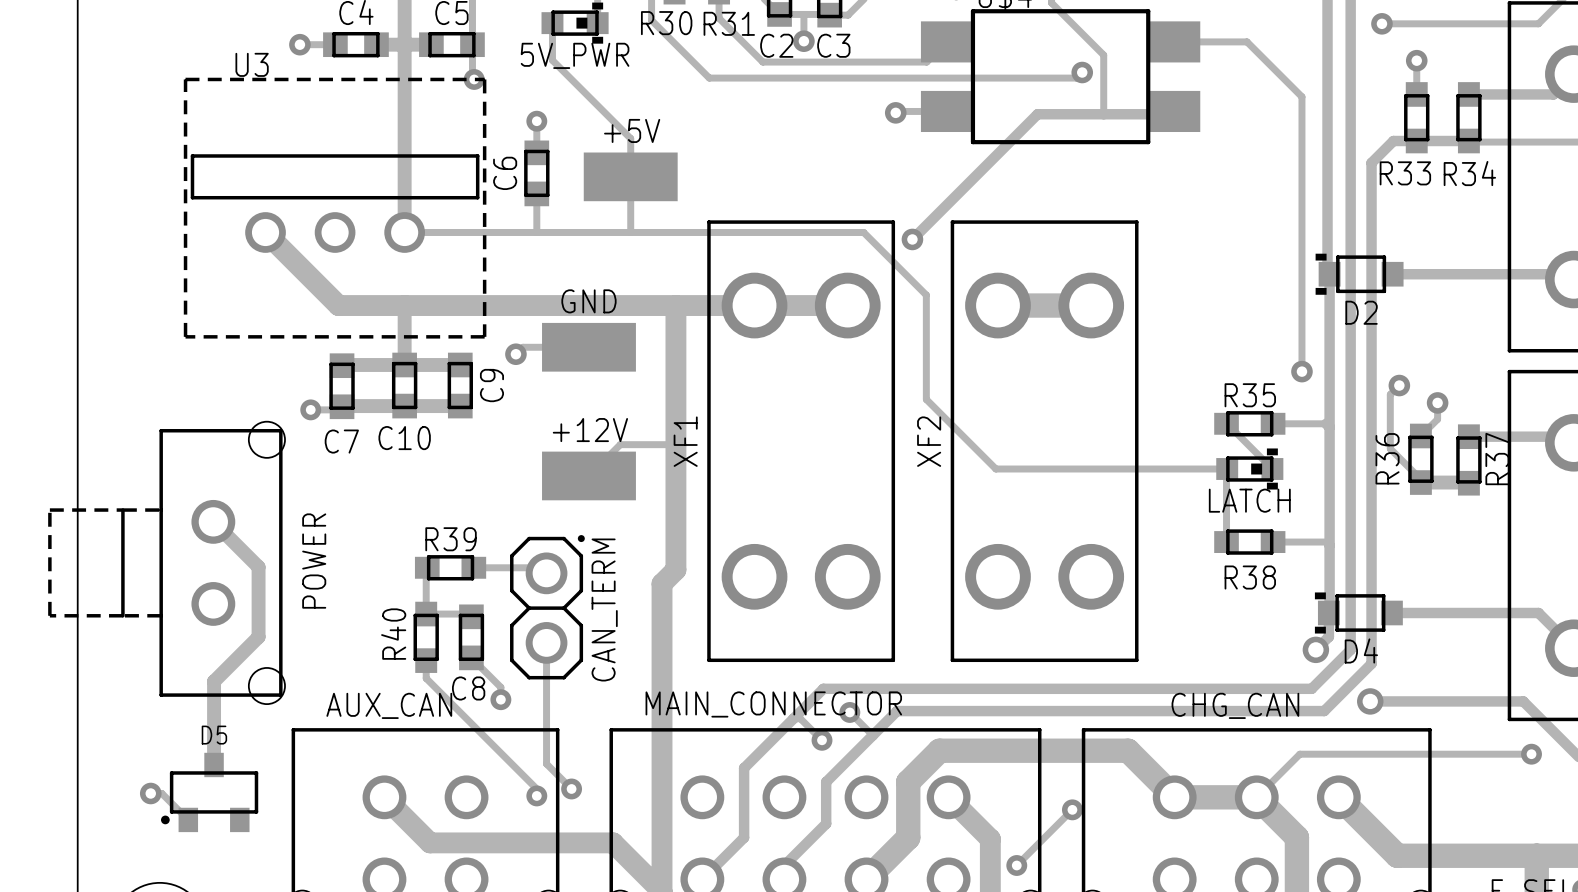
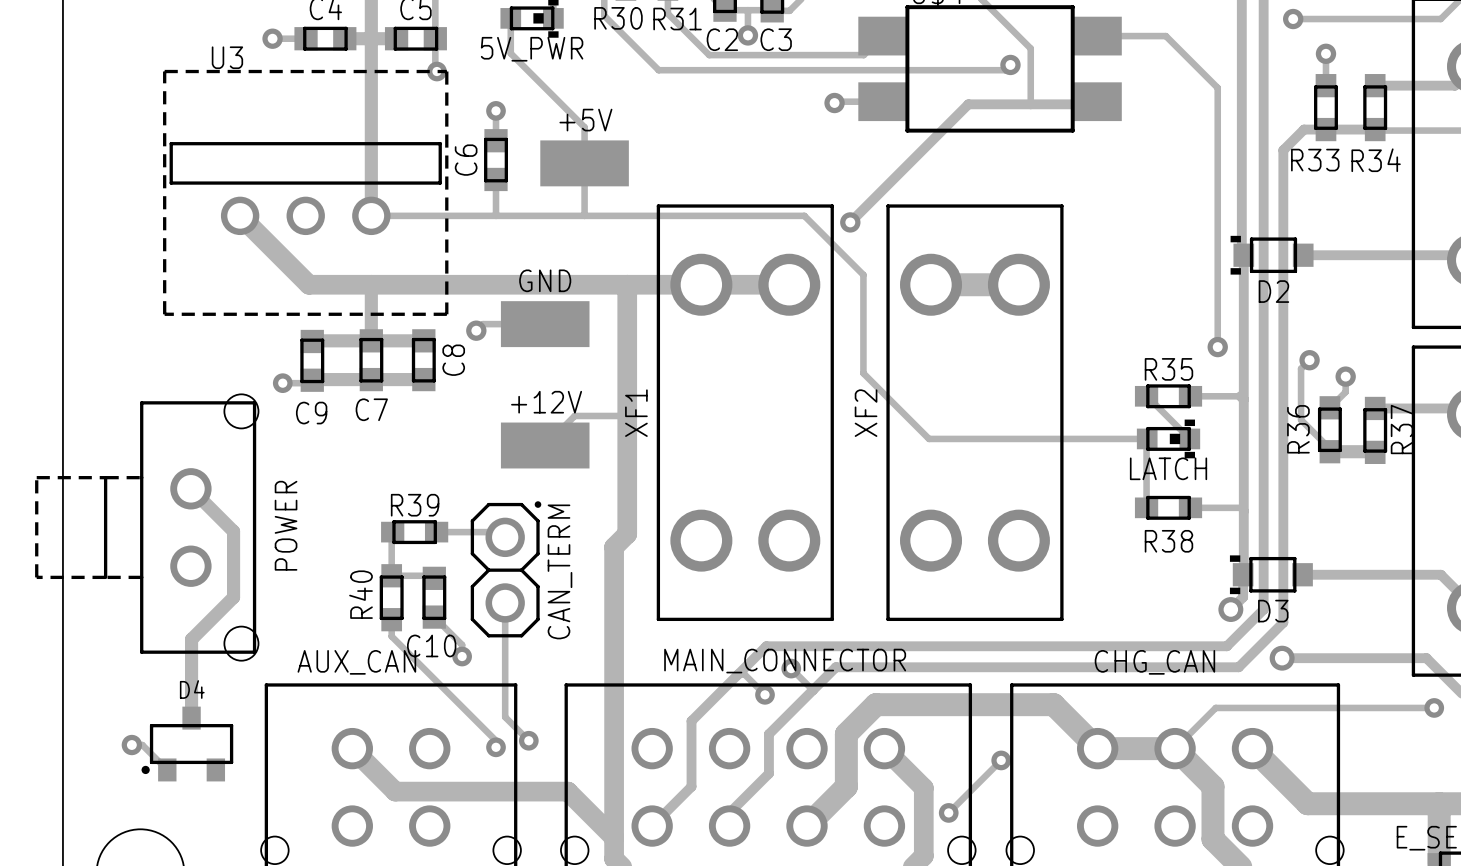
C9 name: C9 (491, 385) -> C8 (453, 360)
C10 name: C10 (404, 438) -> C7 (371, 409)
C7 name: C7 (341, 441) -> C9 (311, 413)
D4 name: D4 (1361, 650) -> D3 (1273, 611)
C8 name: C8 (468, 688) -> C10 (431, 645)
MAIN_CONNECTOR name position: MAIN_CONNECTOR (773, 704) -> MAIN_CONNECTOR (785, 661)
D5 name: D5 (214, 735) -> D4 (192, 689)

